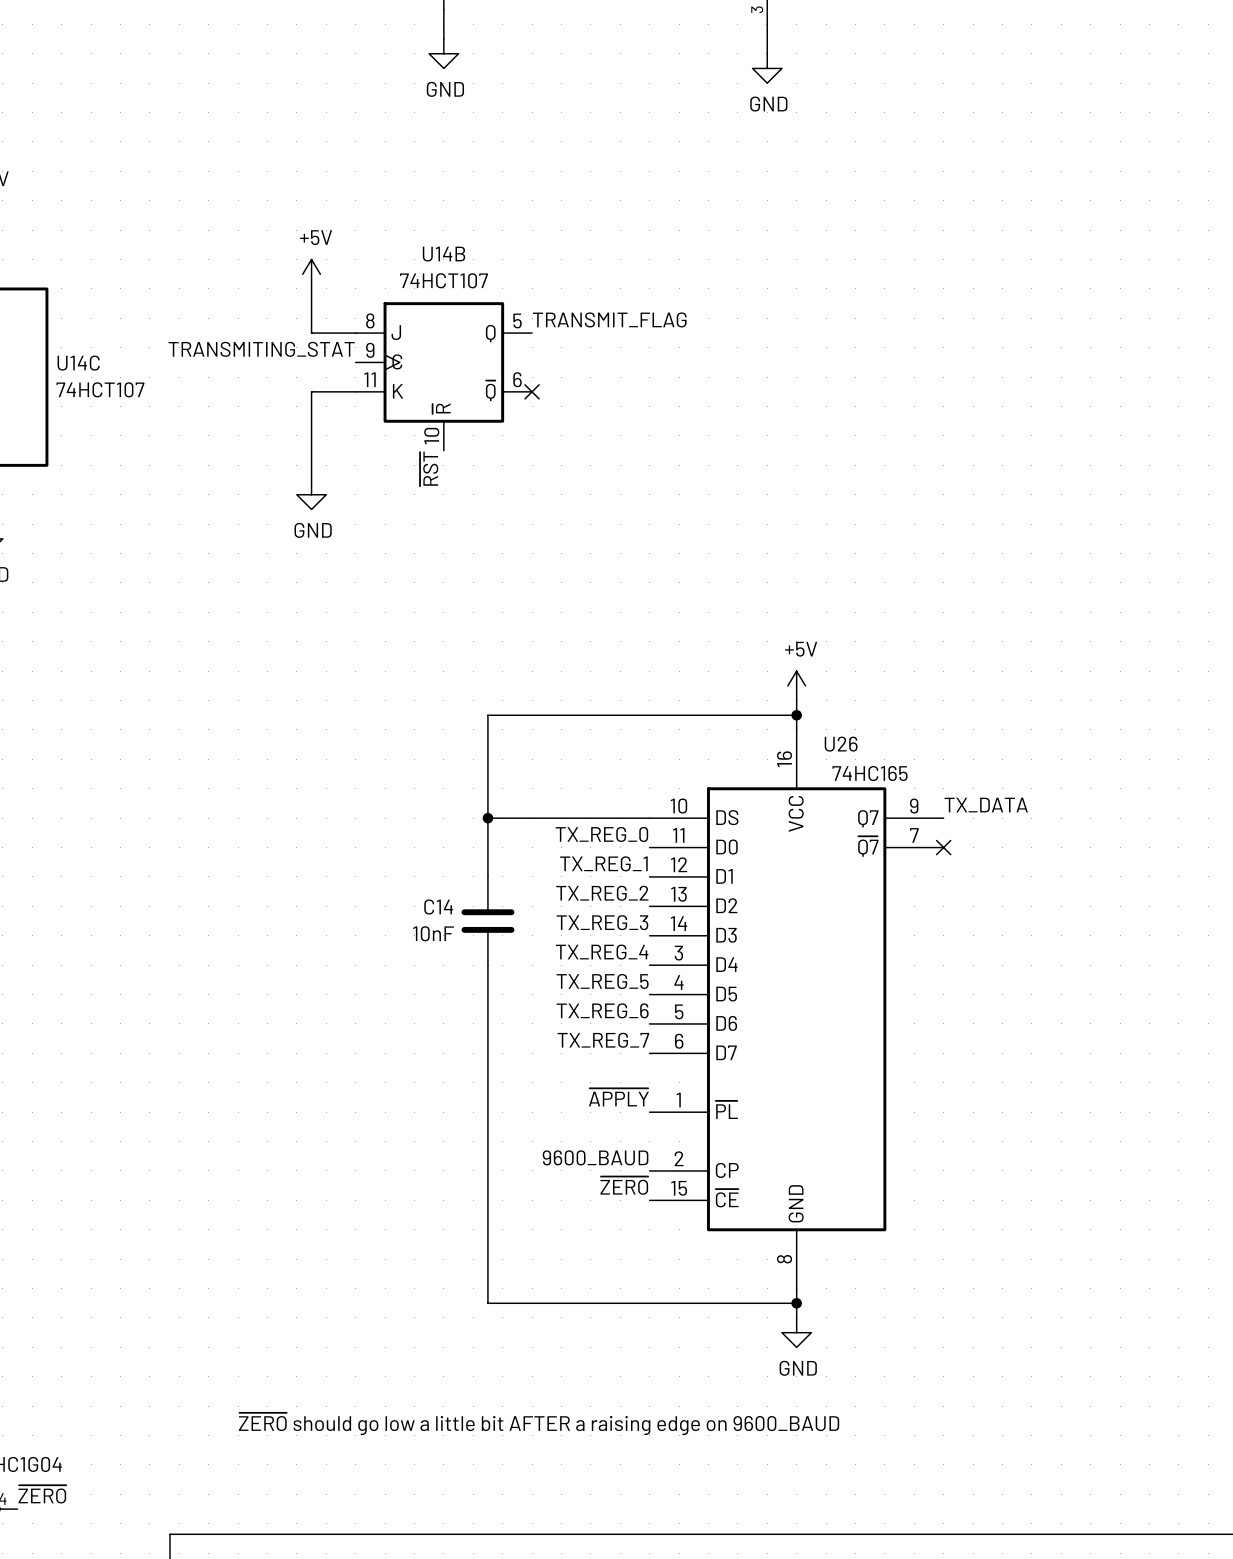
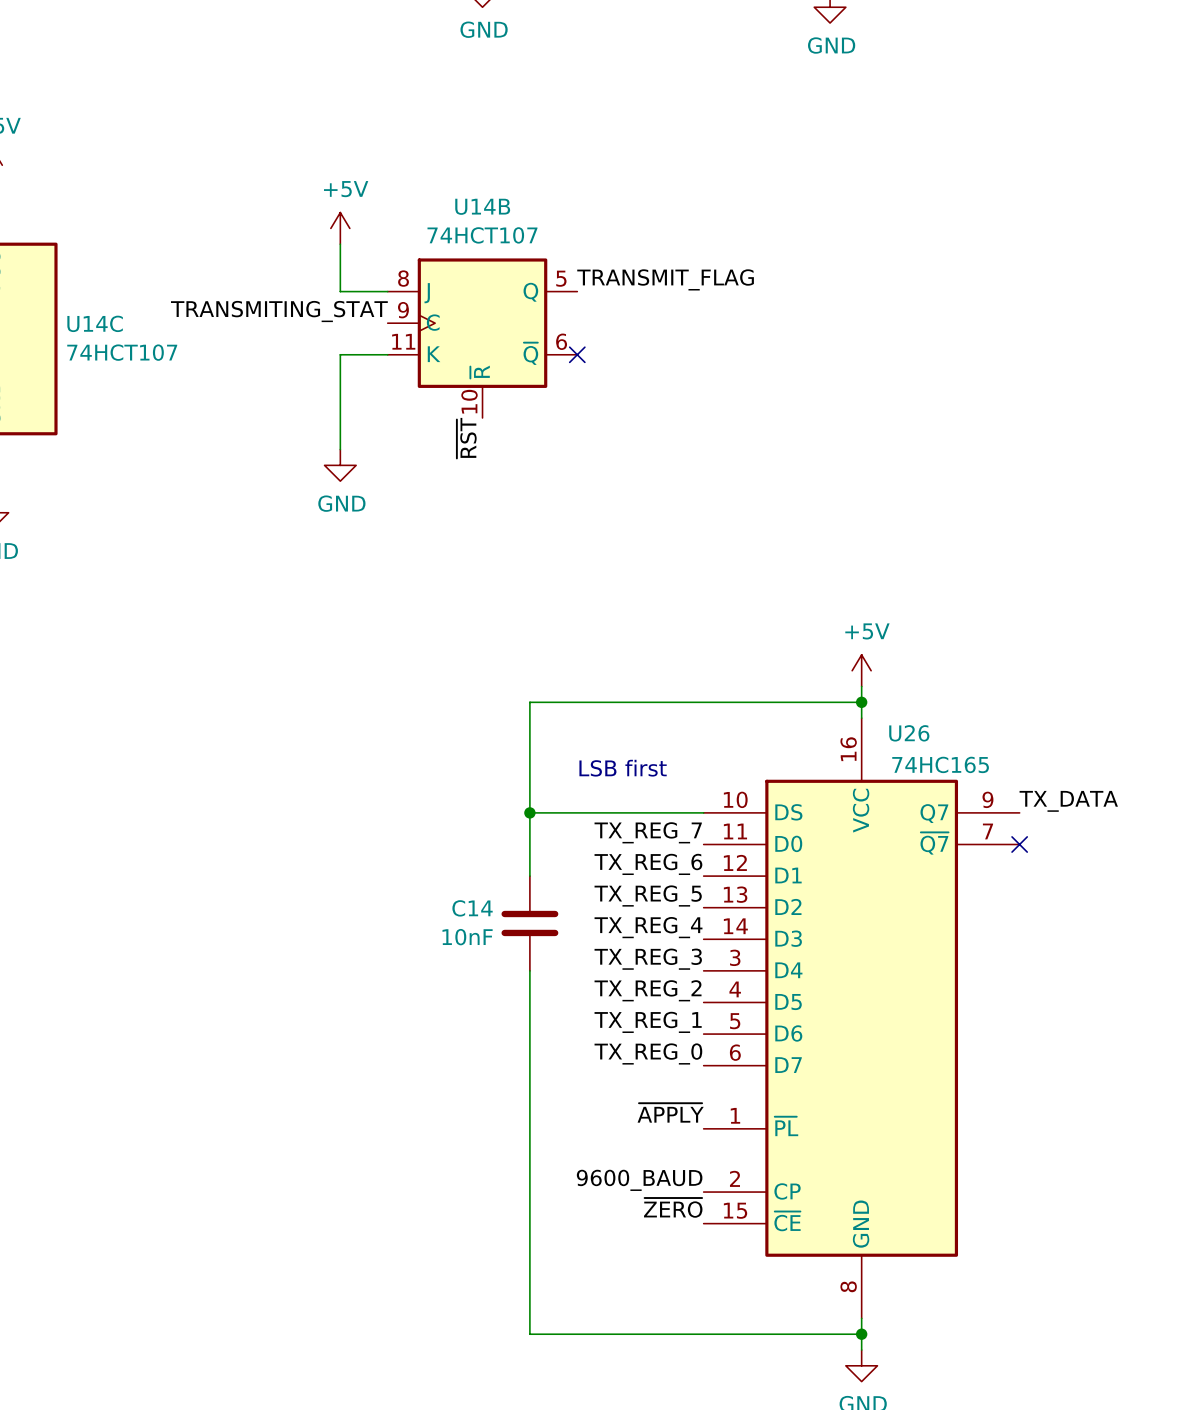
text: none -> LSB first (623, 768)
label: TX_REG_0 (601, 834) -> TX_REG_7 (648, 832)
label: TX_REG_1 (603, 863) -> TX_REG_6 (648, 864)
label: TX_REG_2 (602, 893) -> TX_REG_5 (648, 896)
label: TX_REG_3 (602, 922) -> TX_REG_4 (648, 927)
label: TX_REG_4 (602, 952) -> TX_REG_3 (648, 959)
label: TX_REG_5 (602, 981) -> TX_REG_2 (648, 990)
label: TX_REG_6 (602, 1010) -> TX_REG_1 (648, 1022)
label: TX_REG_7 (603, 1040) -> TX_REG_0 (648, 1053)

